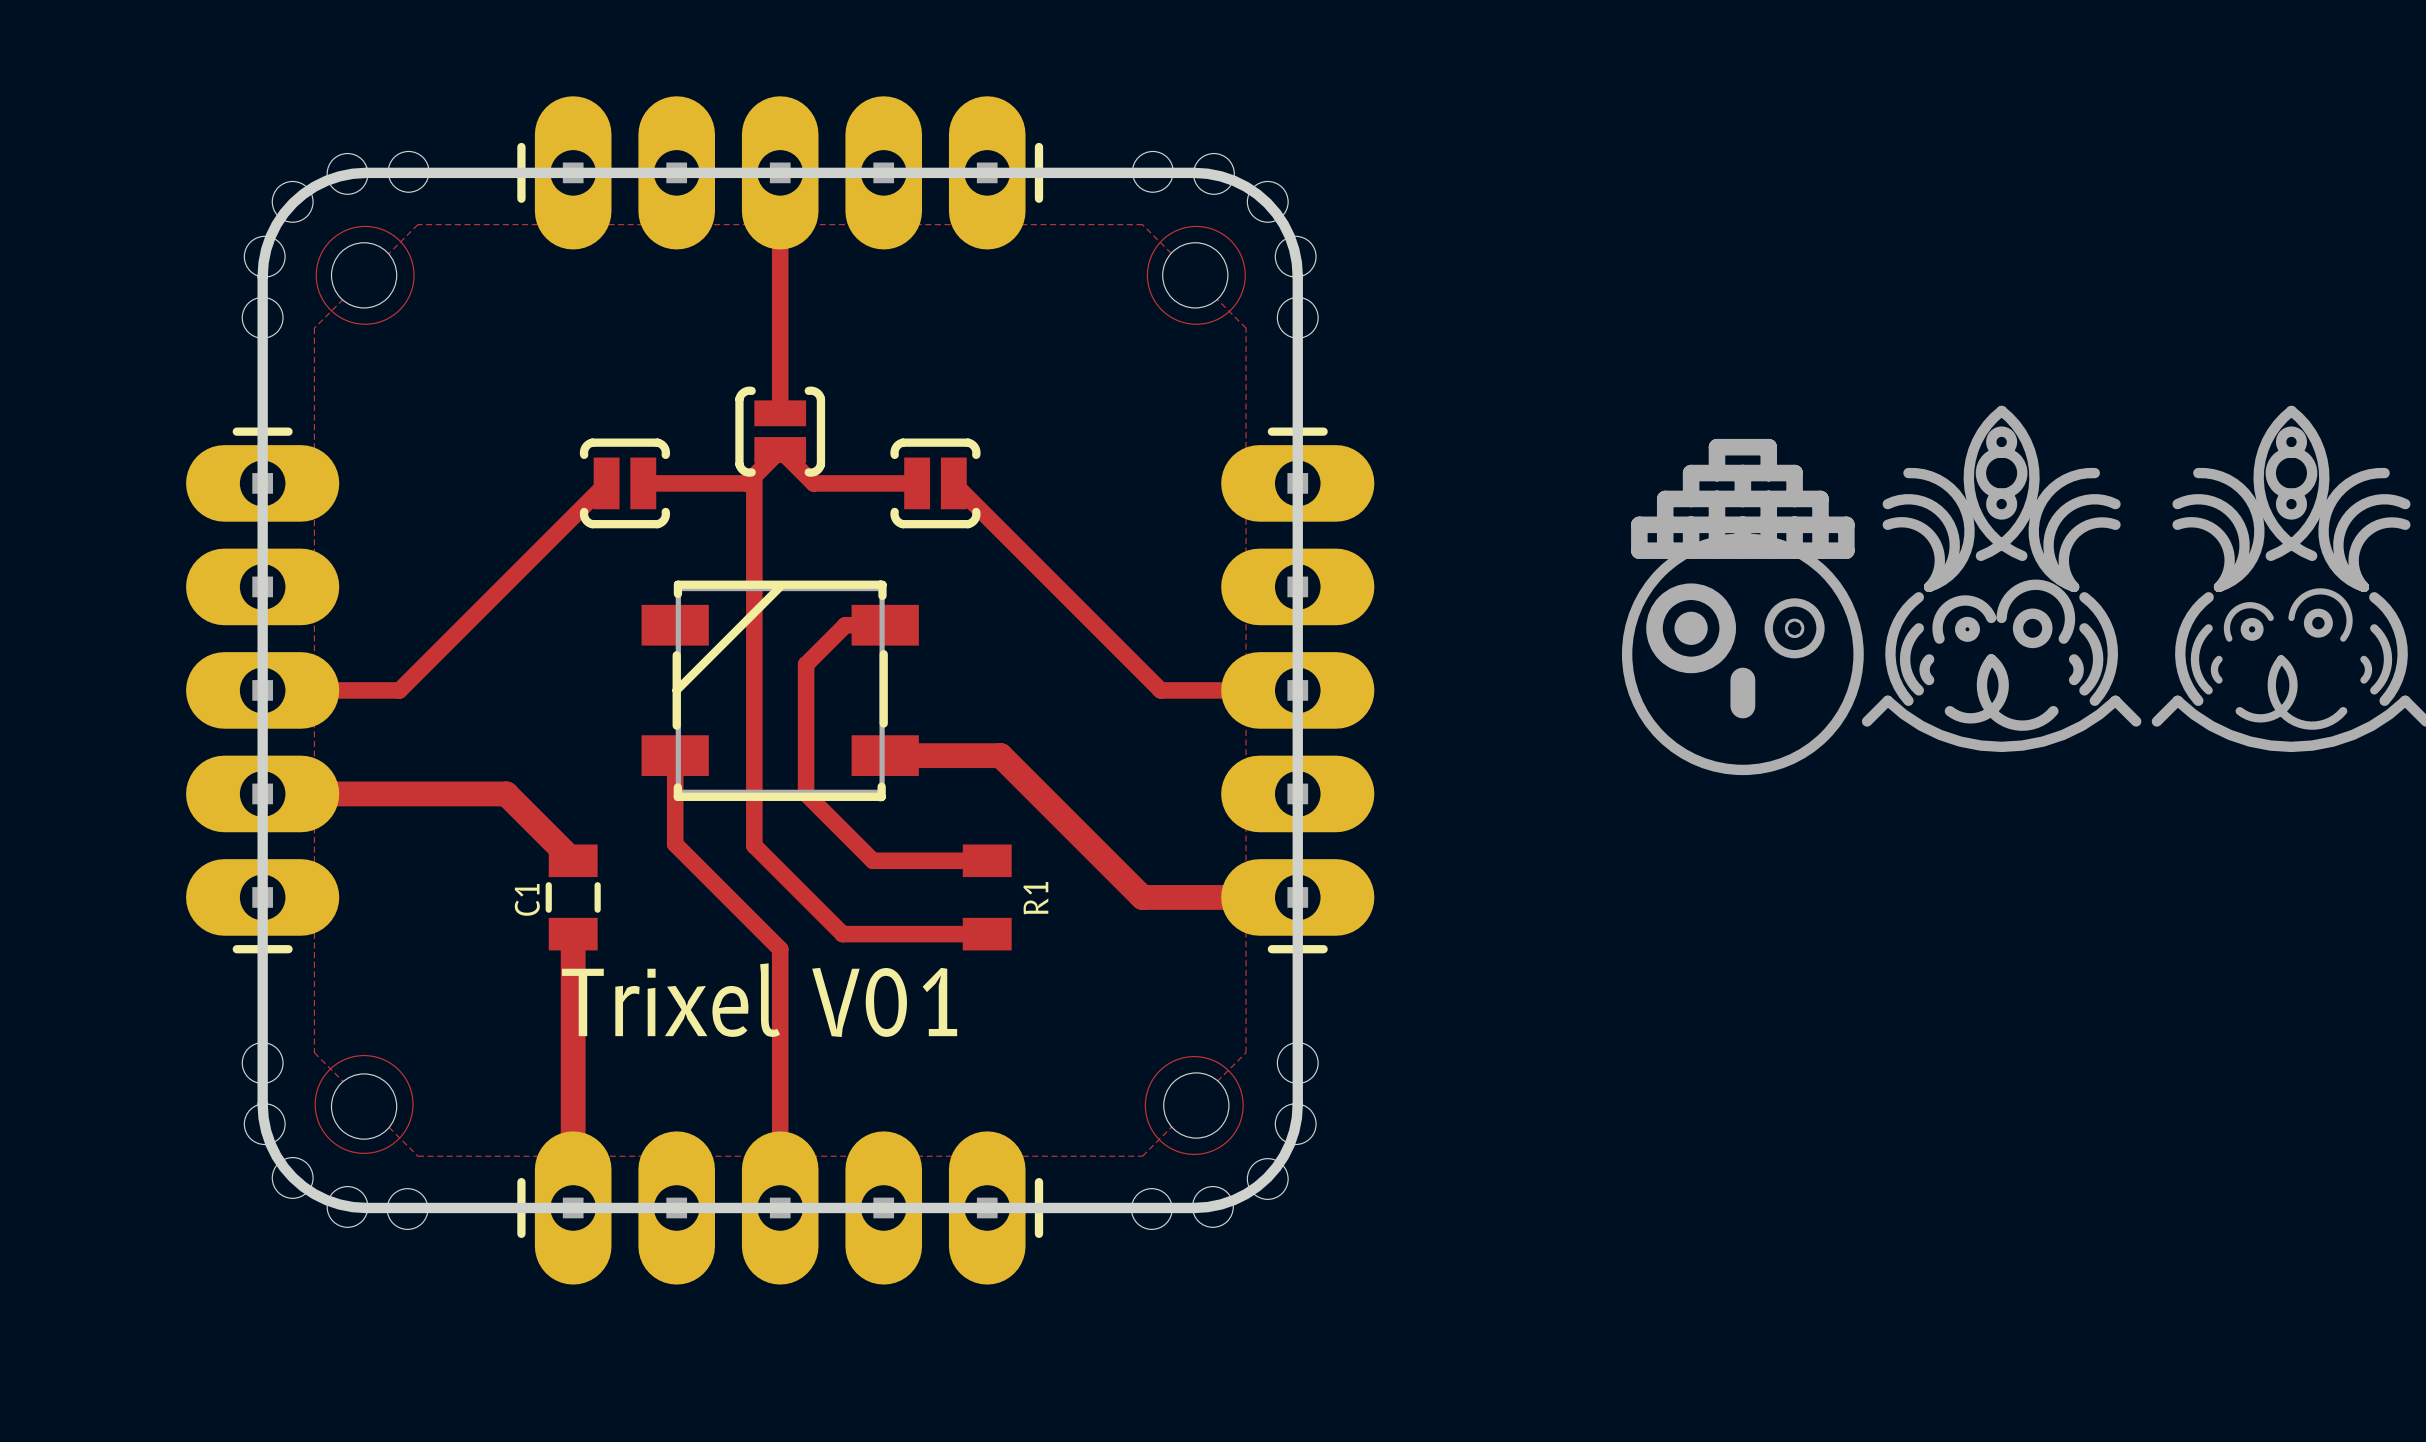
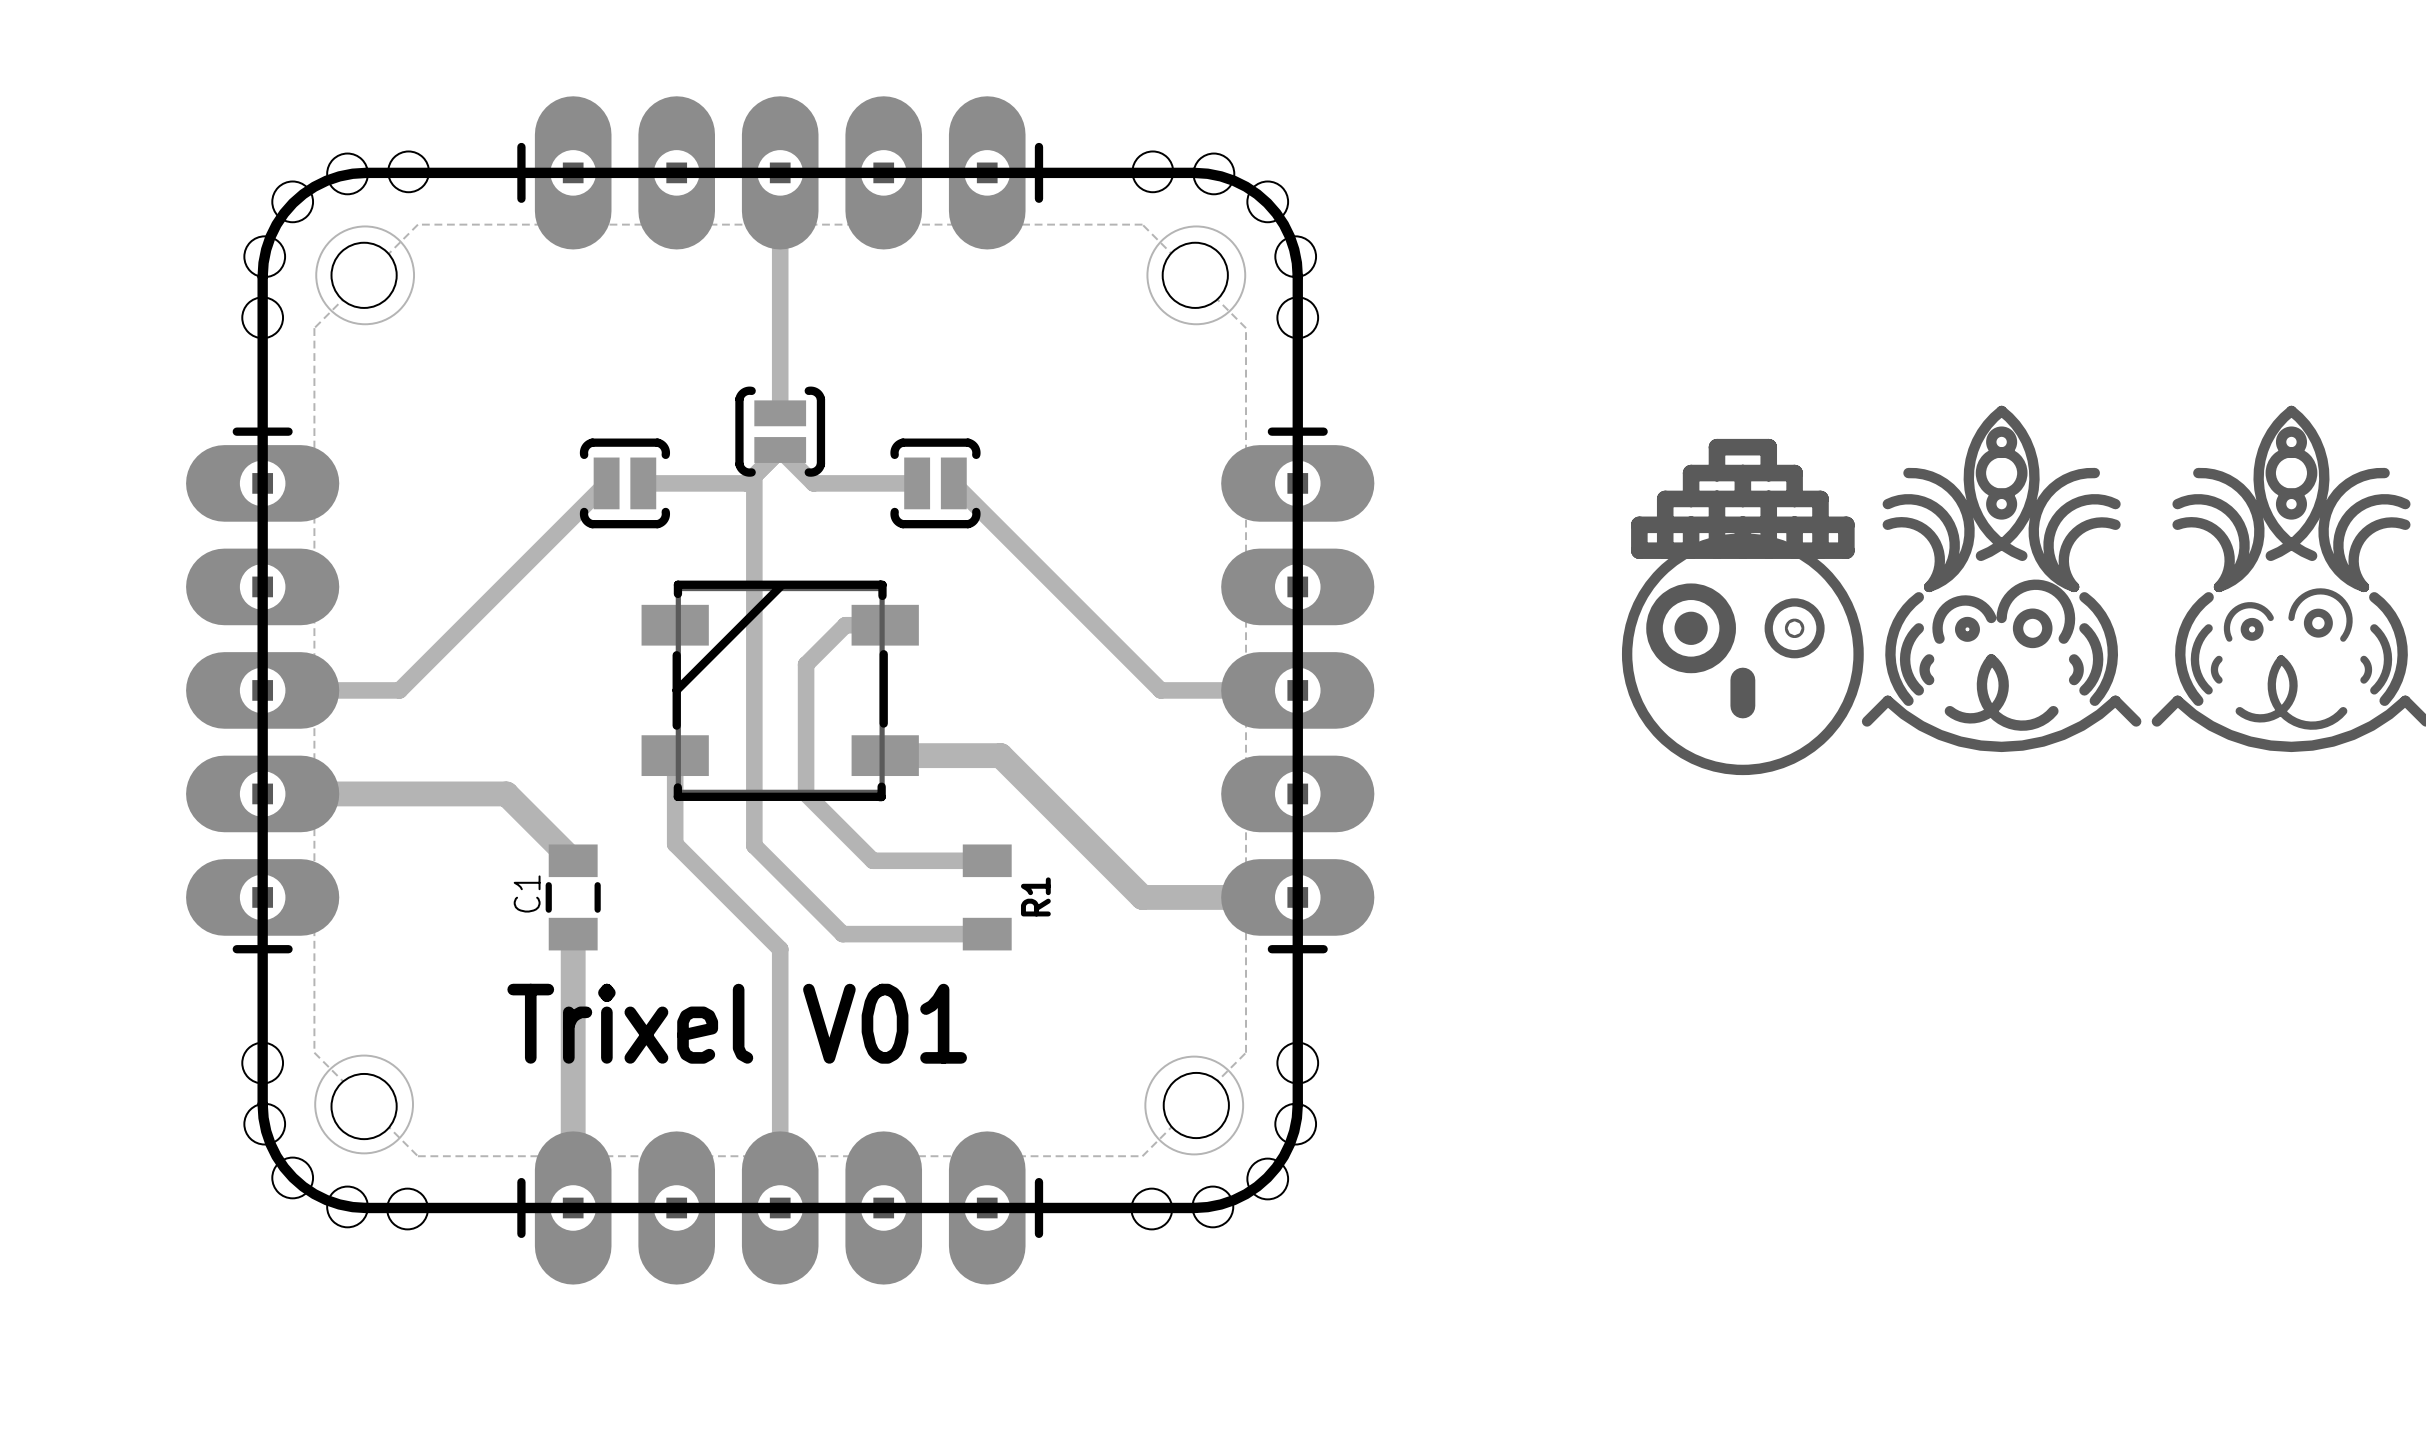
text position: Trixel V01 (759, 1000) -> Trixel V01 (737, 1023)

